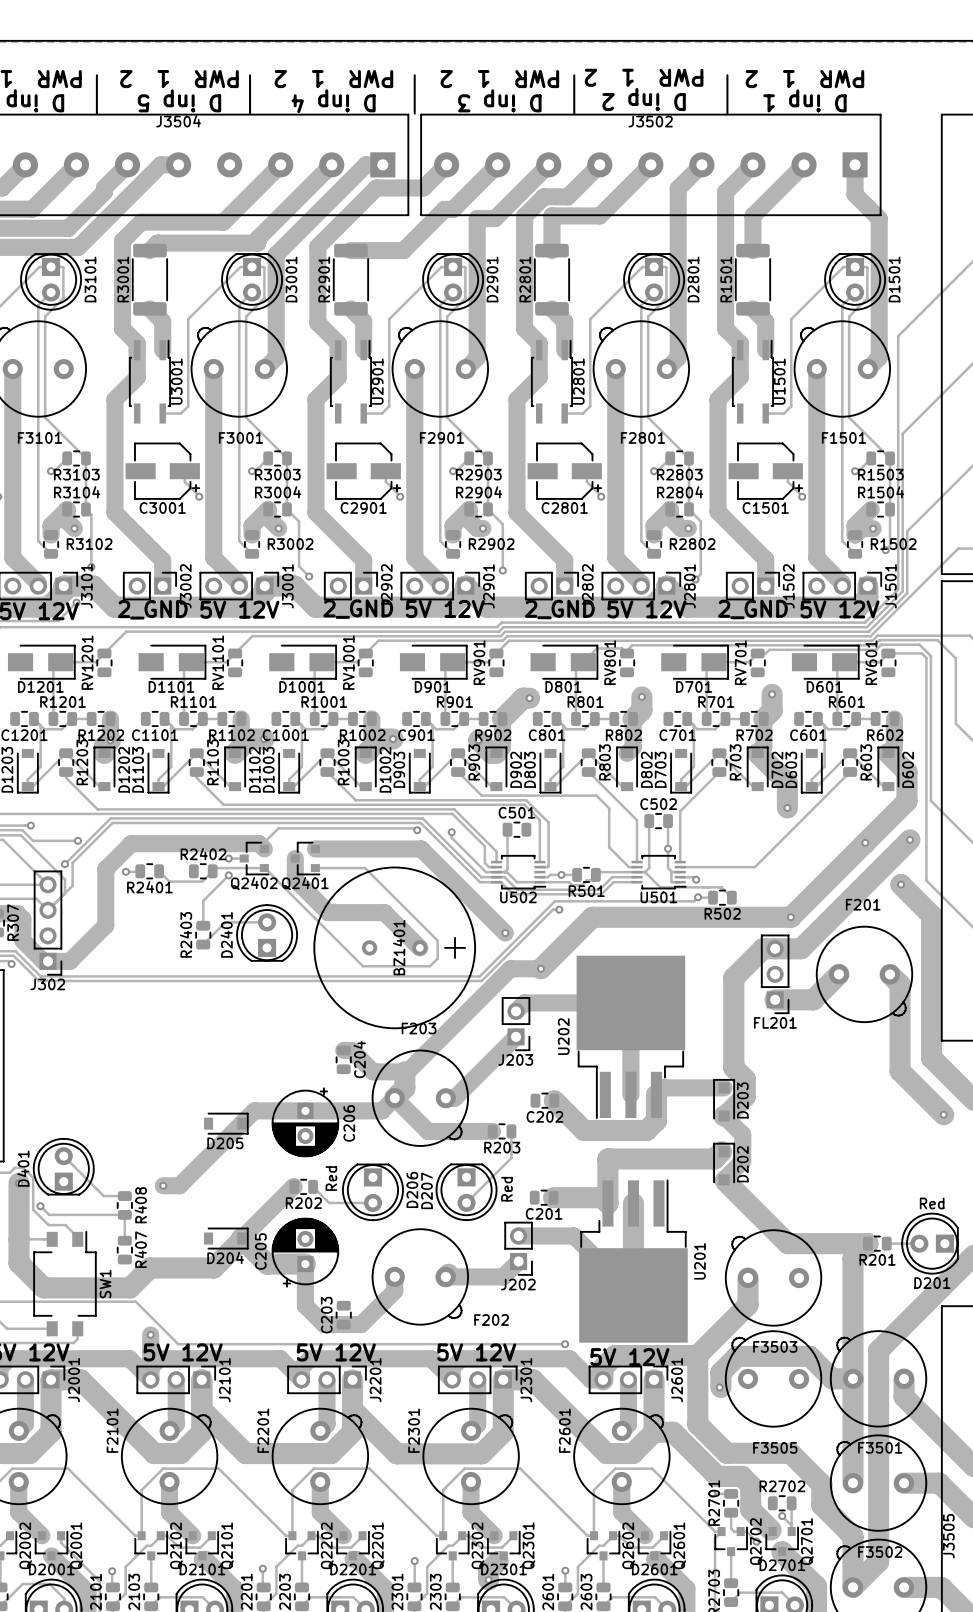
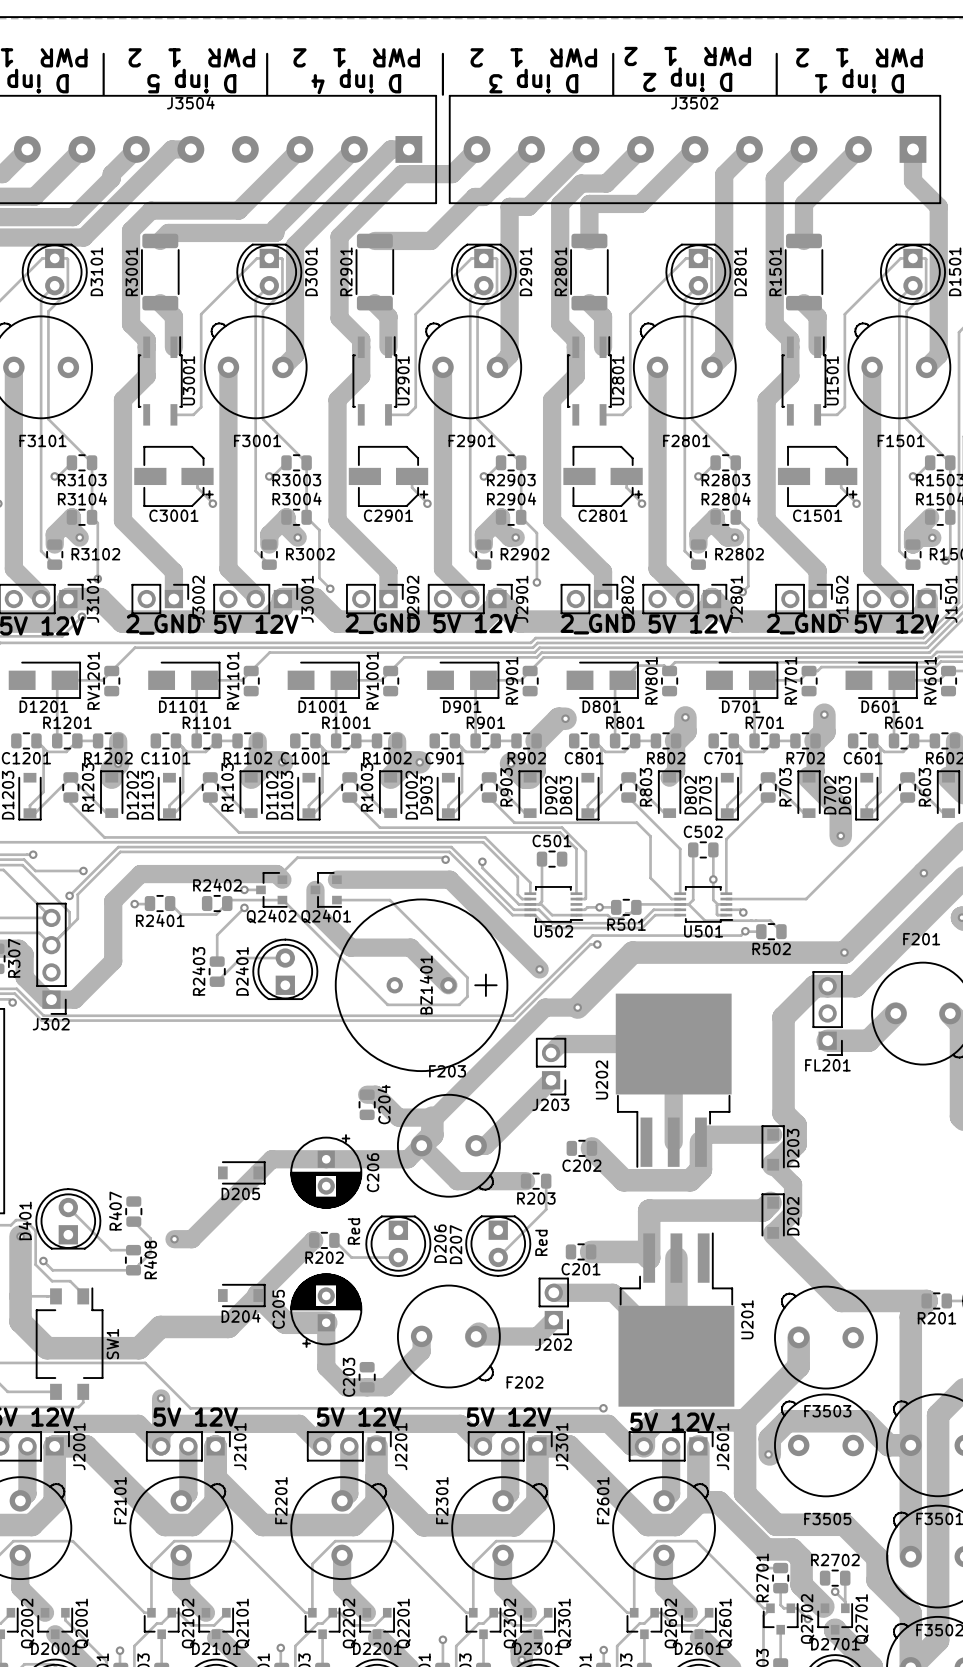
track: (124, 1214) (124, 1240) -> (133, 1270) (150, 1253) (150, 1238) (133, 1221)
R407 name position: R407 (140, 1249) -> R407 (115, 1211)
R407 position: (124, 1250) -> (133, 1211)

